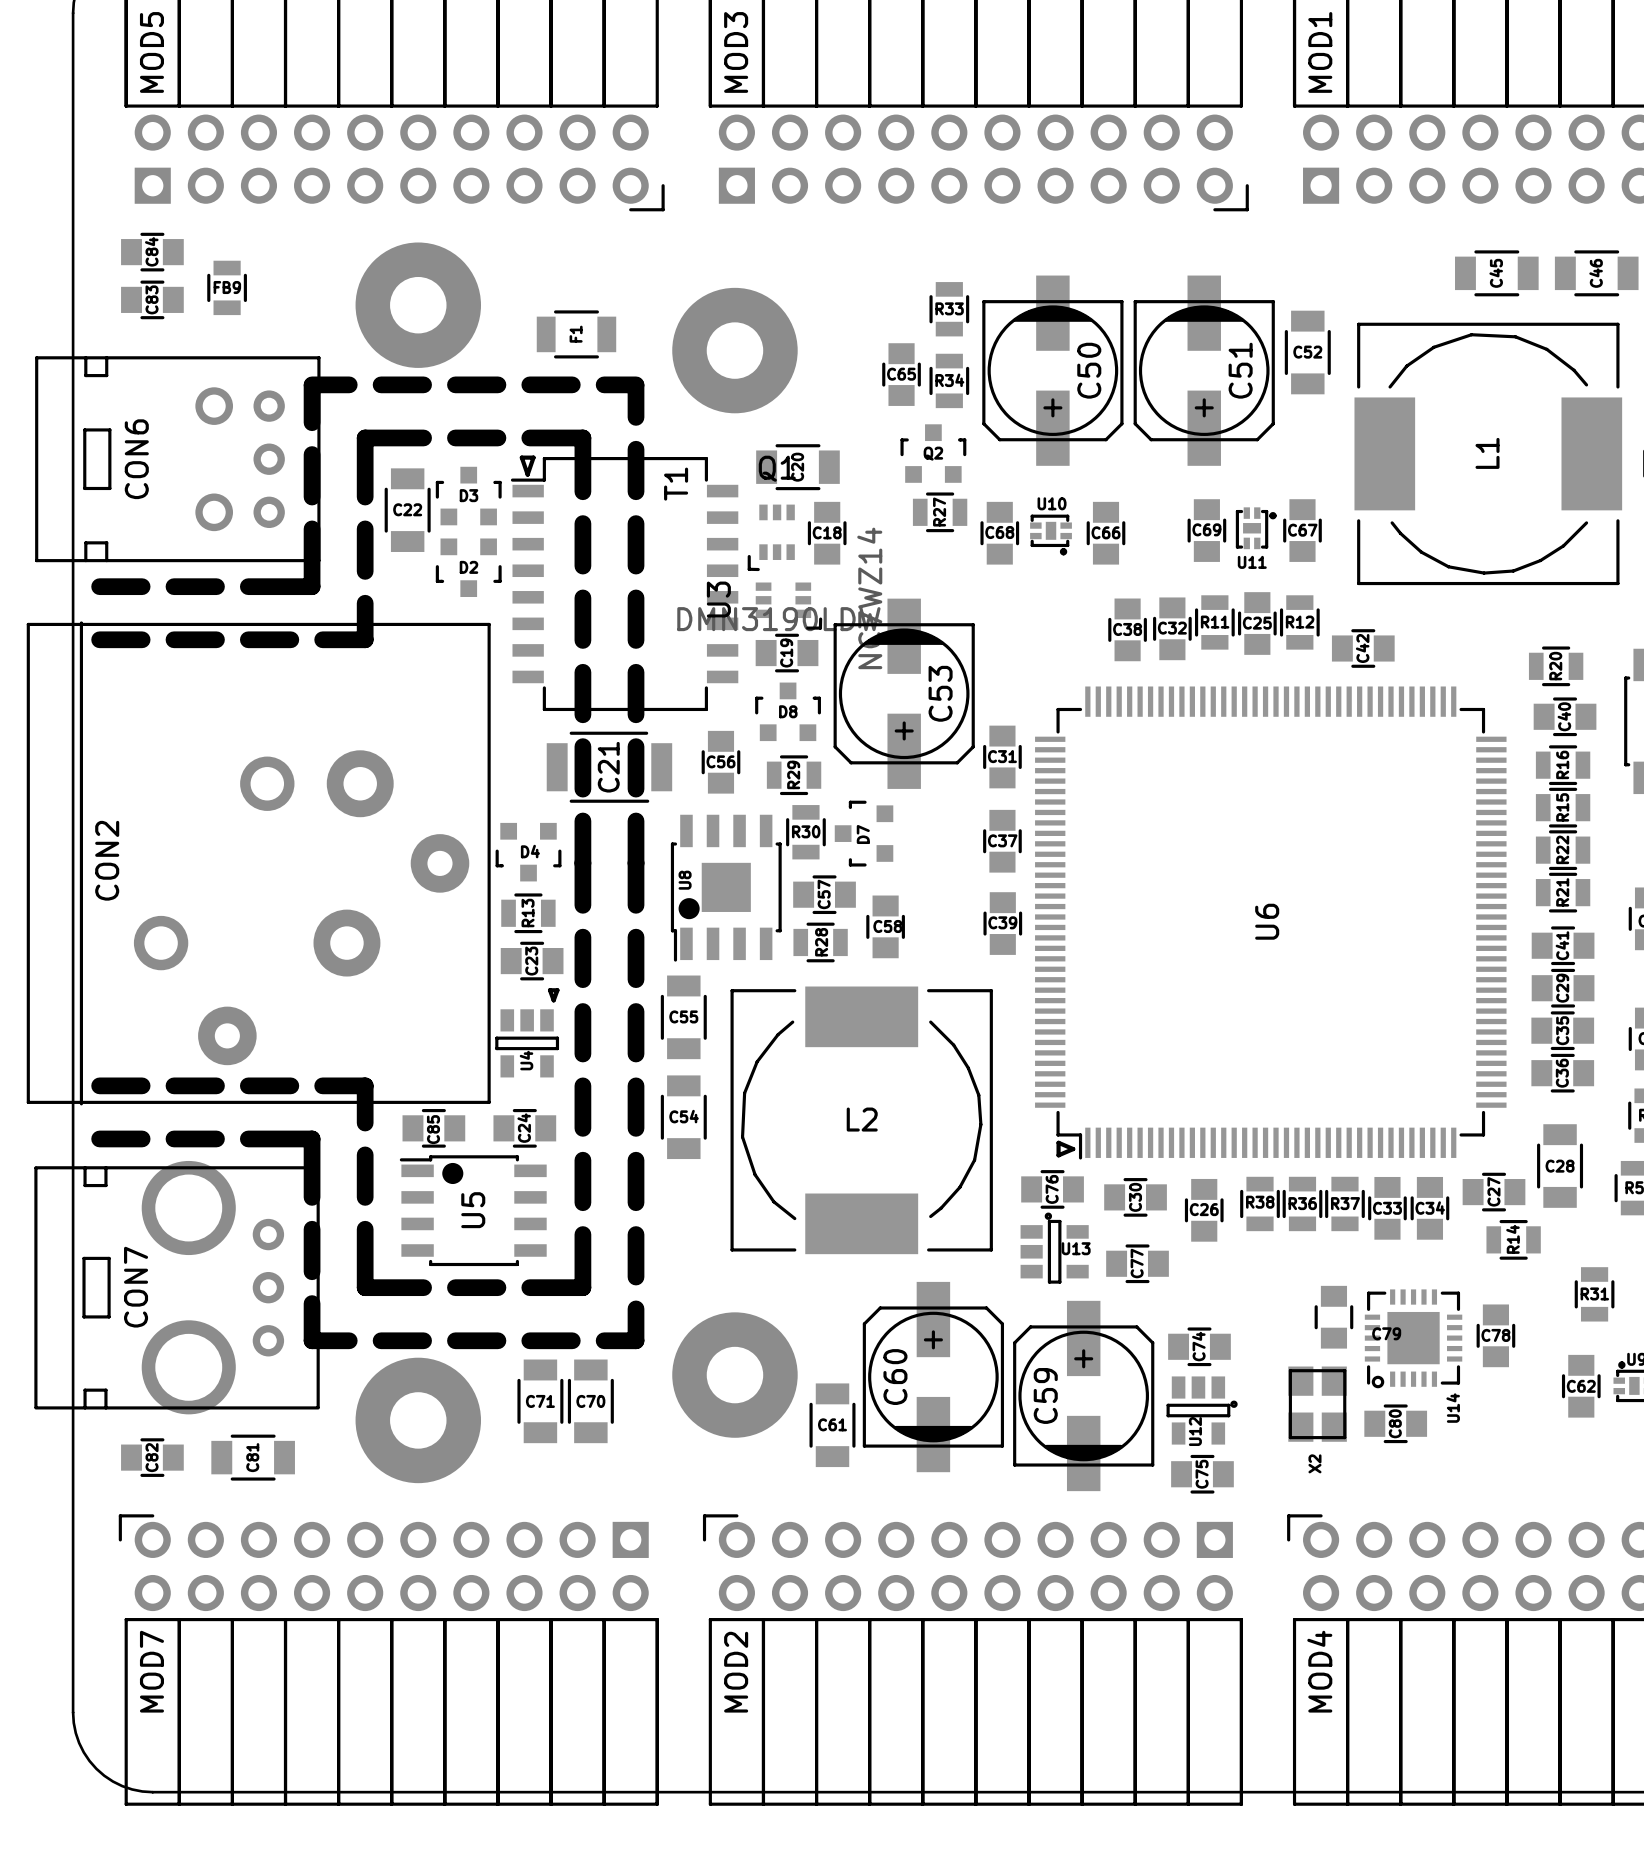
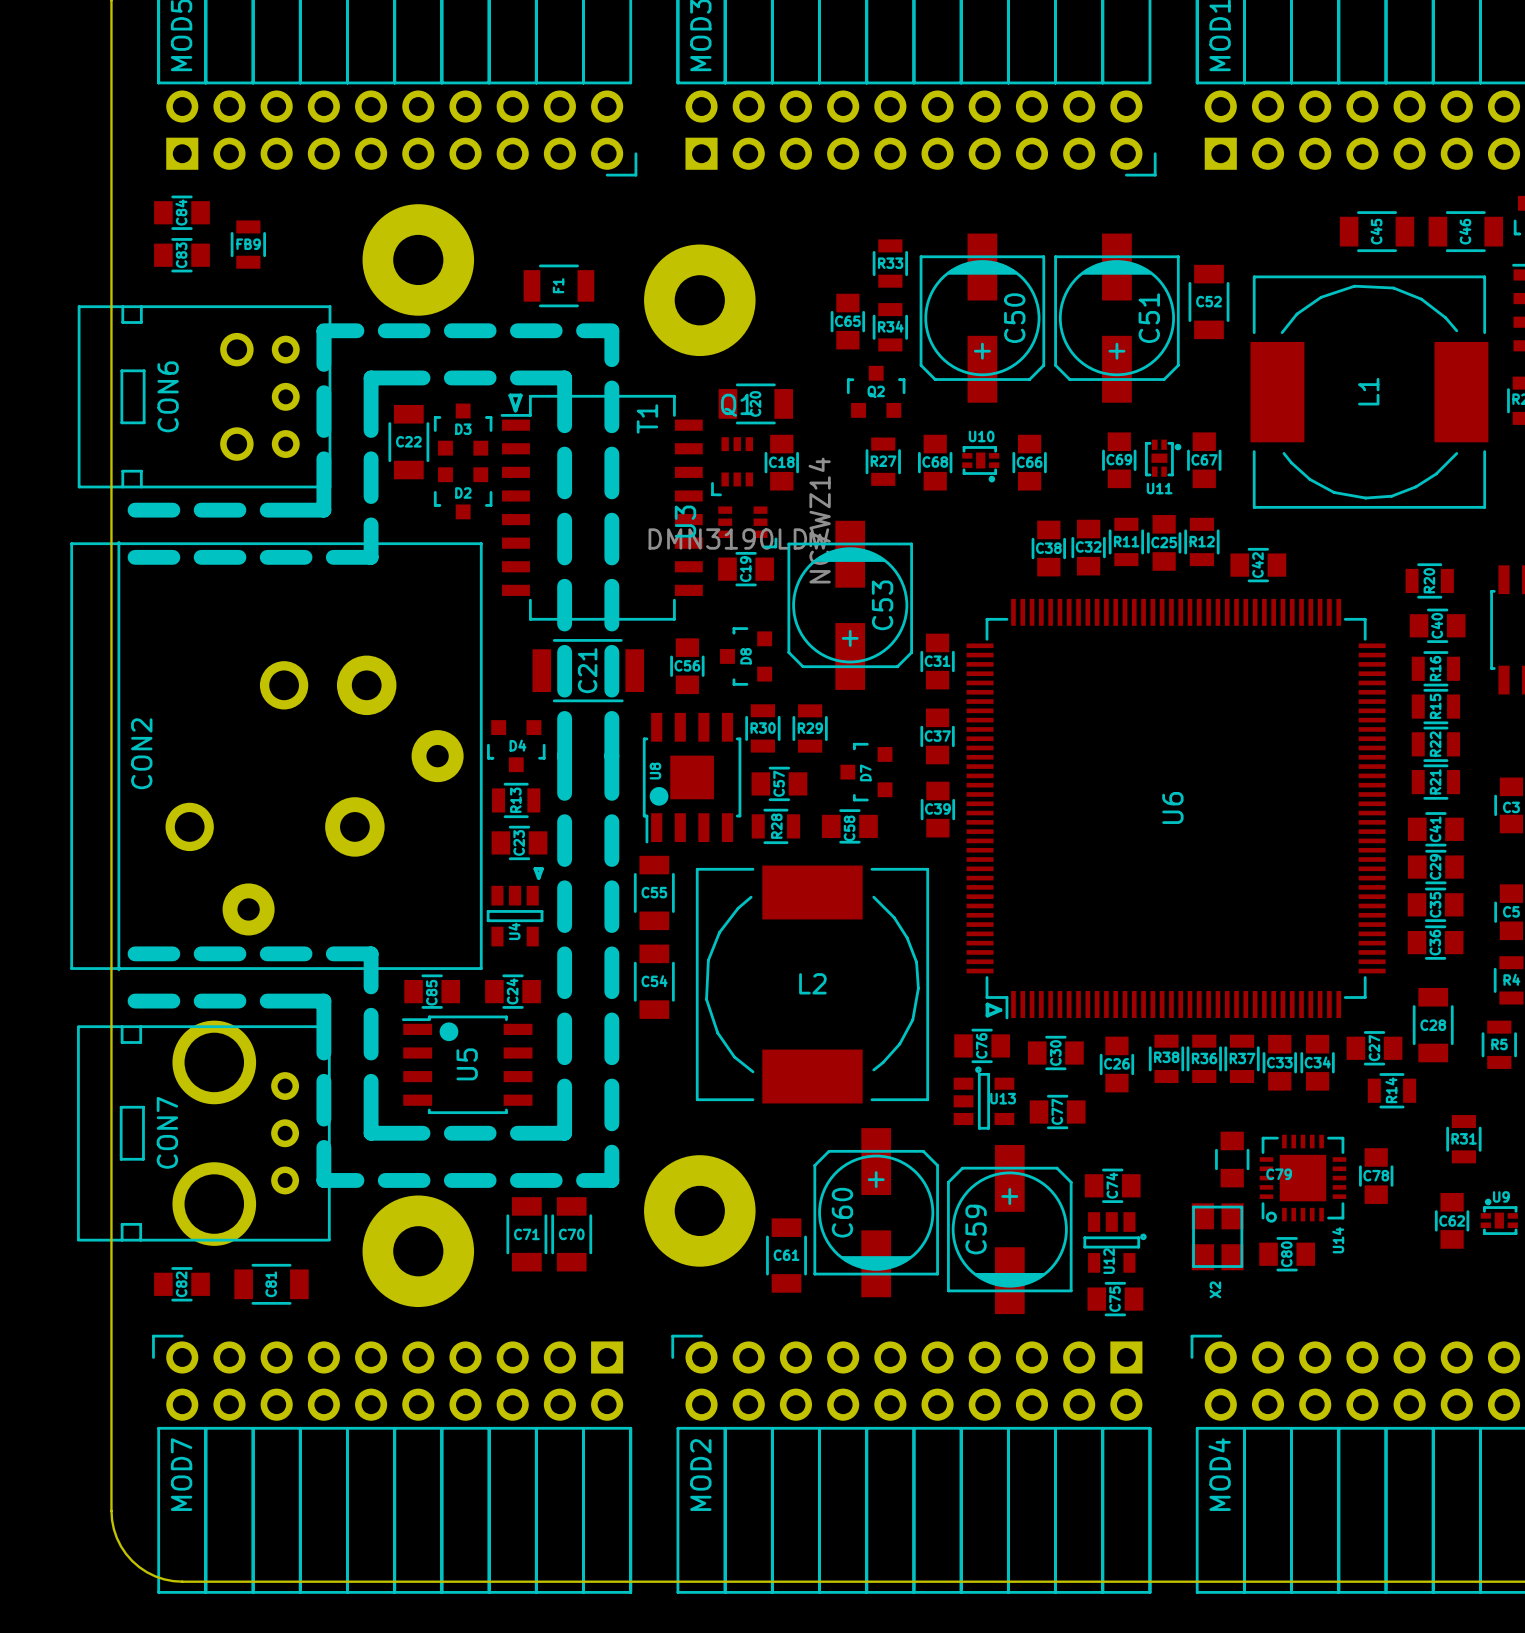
R27 rotation: 0° (940, 512) -> 90° clockwise (883, 461)
D8 rotation: 0° (788, 711) -> 90° counterclockwise (746, 656)
R29 rotation: 0° (794, 775) -> 90° clockwise (810, 728)
R29 position: (794, 775) -> (810, 728)
D7 position: (864, 833) -> (866, 772)
C58 rotation: 0° (885, 926) -> 90° clockwise (849, 826)

